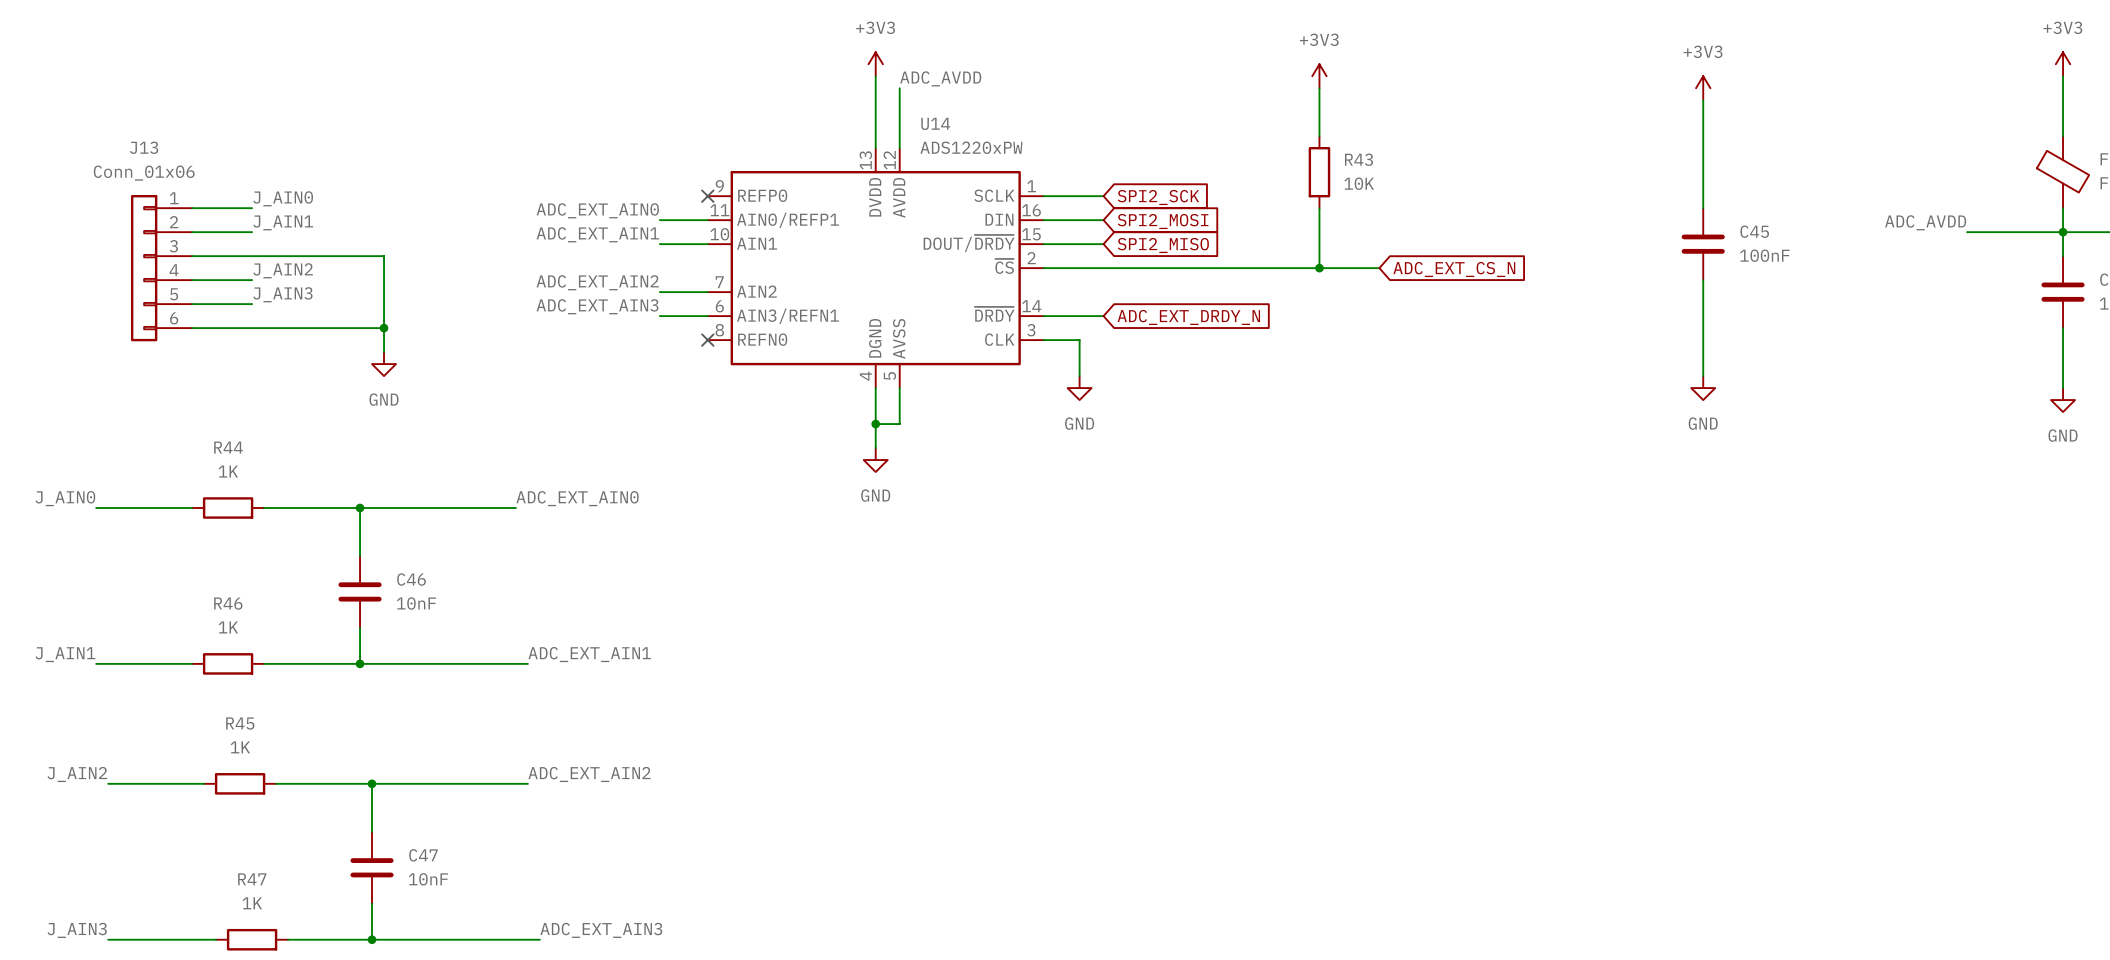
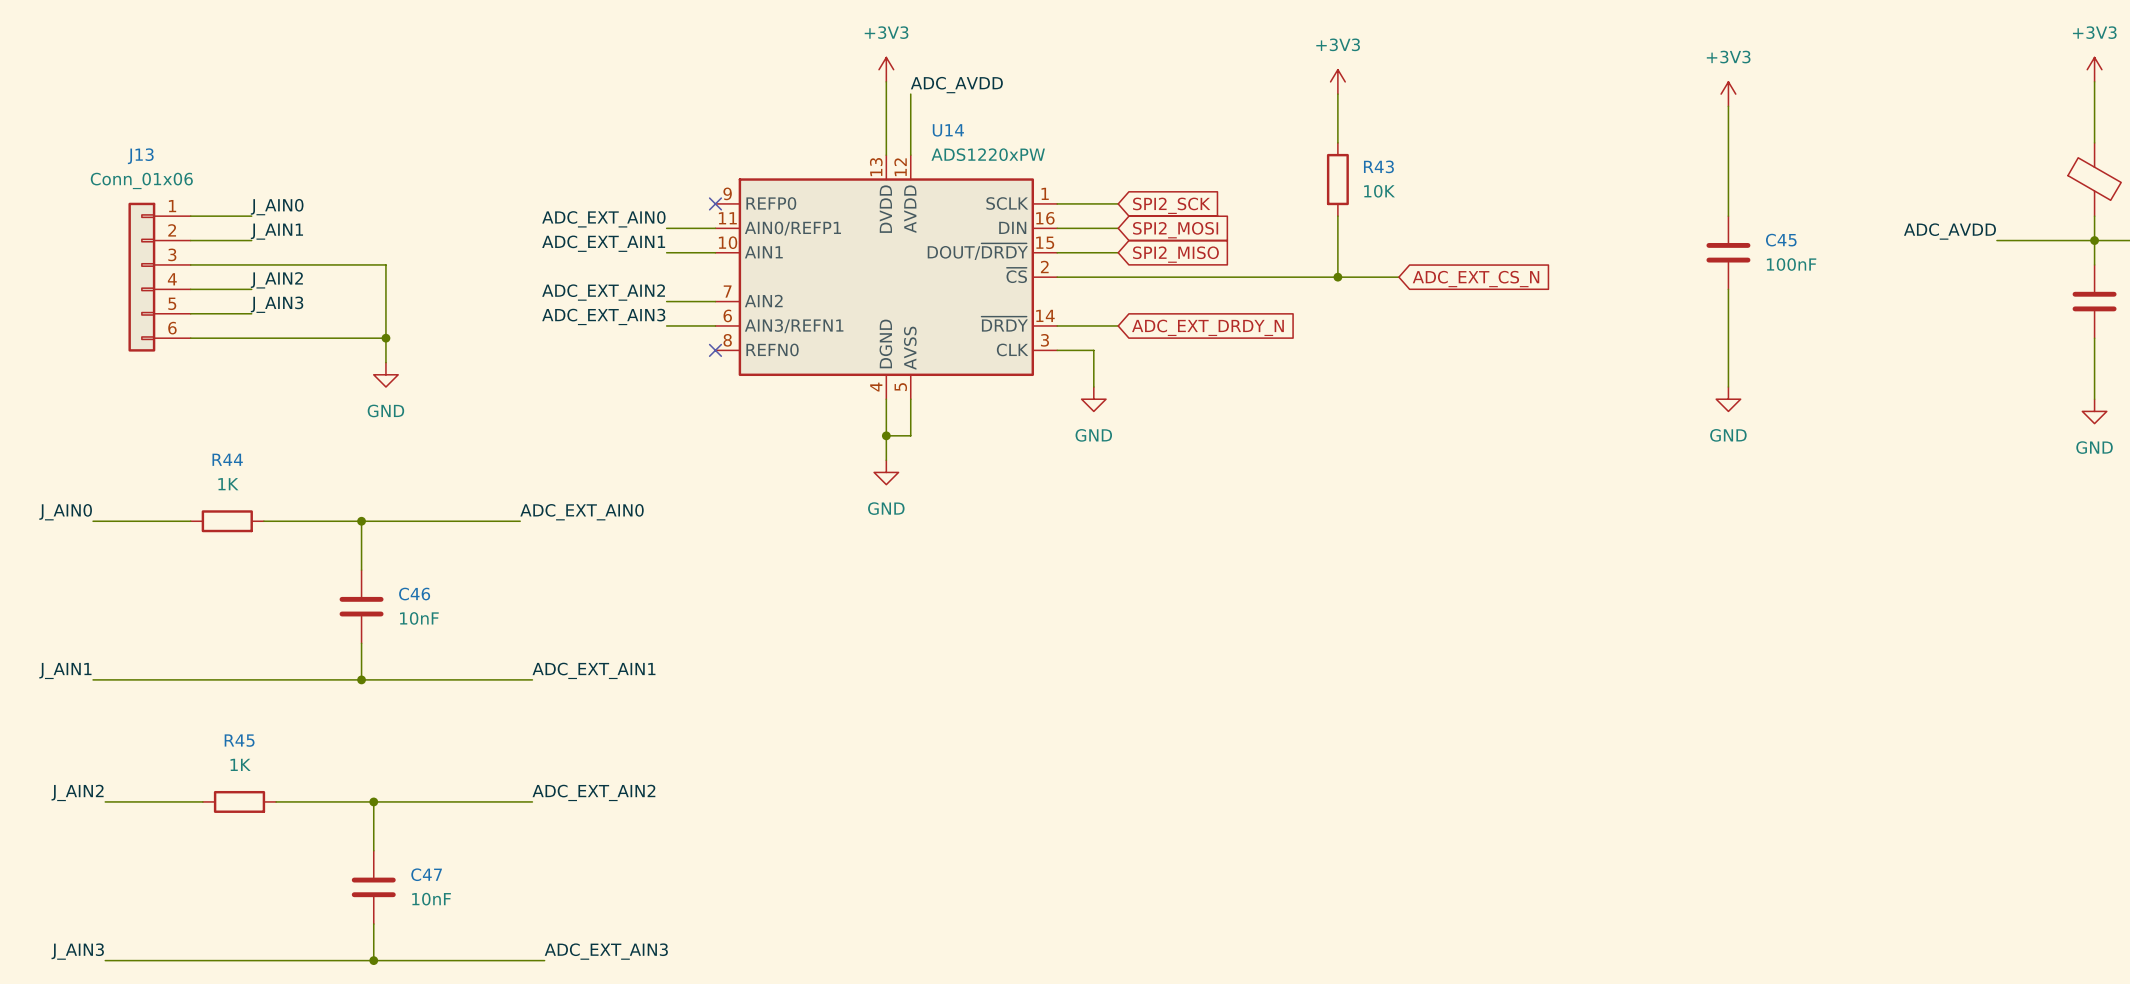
wire: none -> (190, 679) (263, 679)
R46: 1K (228, 663) -> none
wire: none -> (215, 960) (288, 960)
R47: 1K (252, 939) -> none

